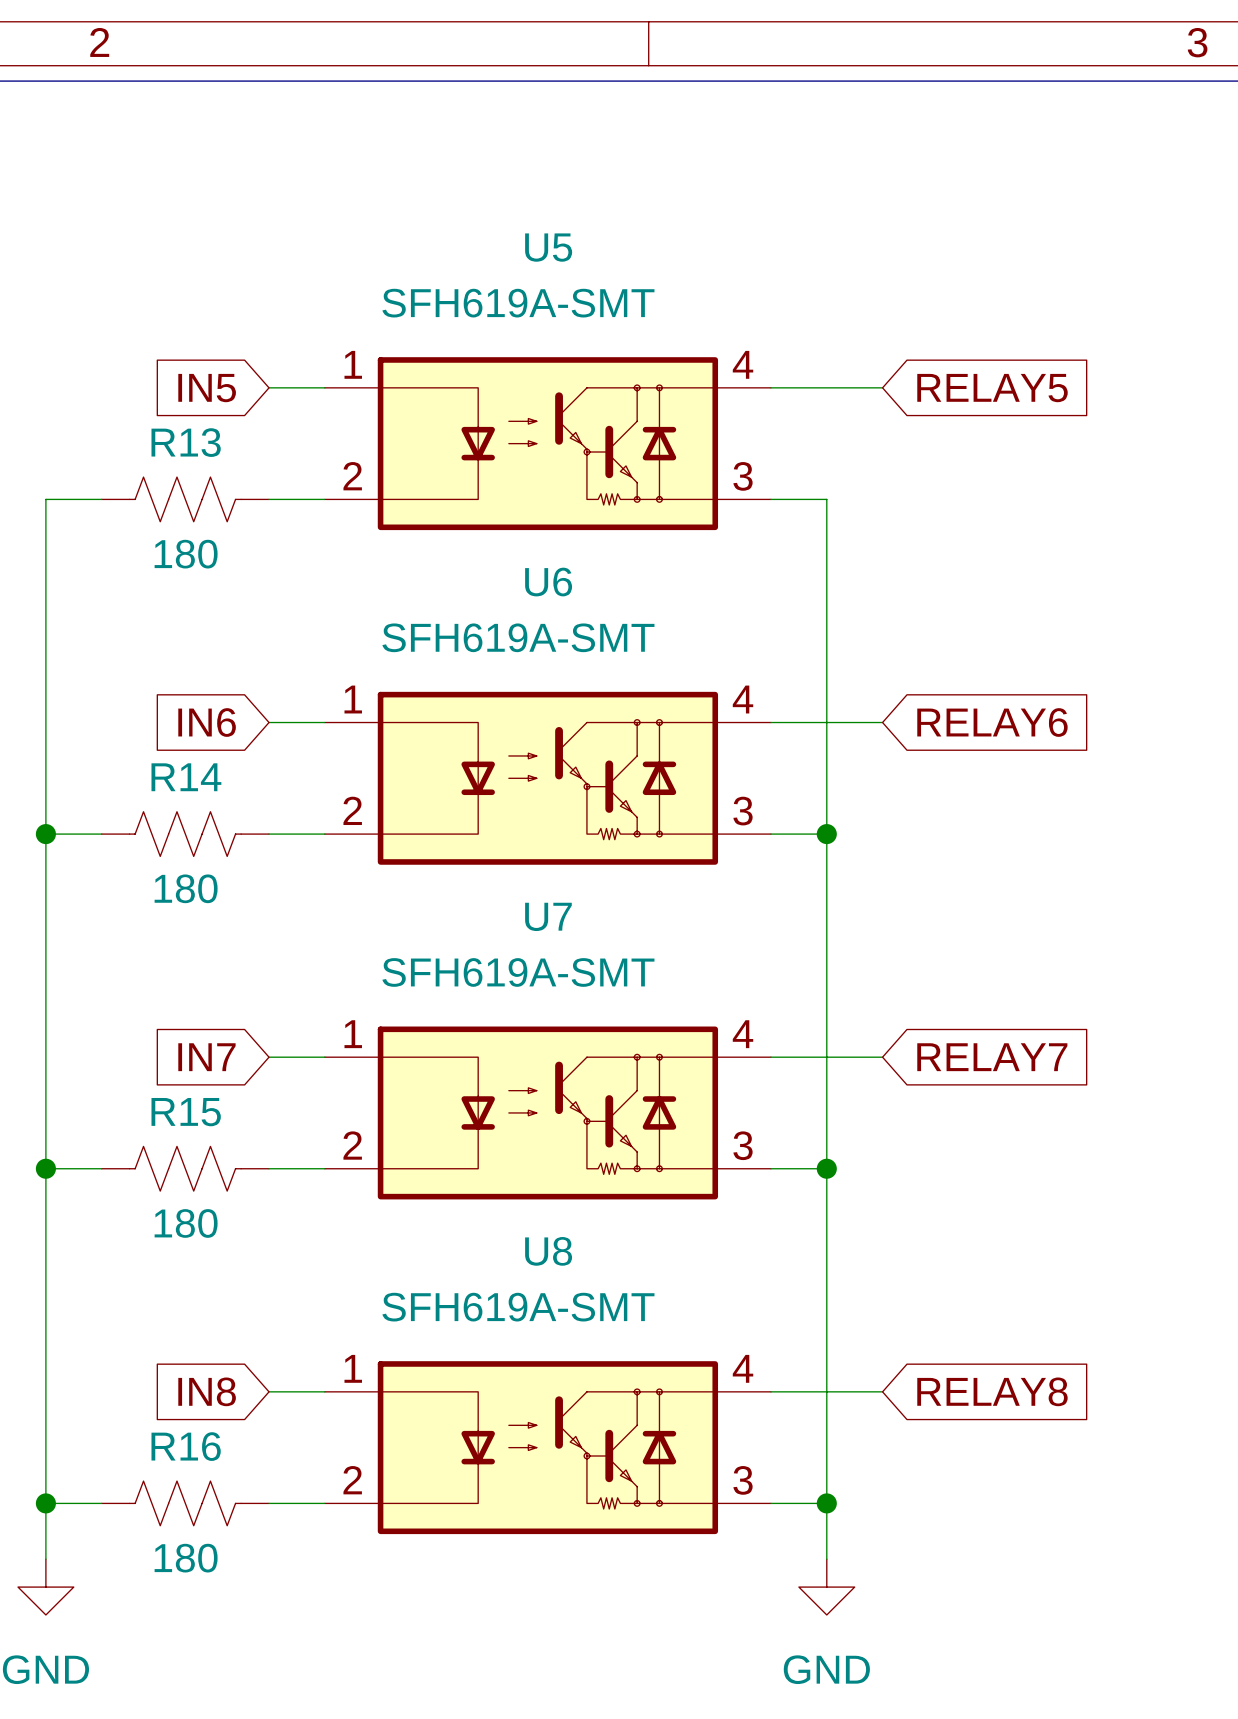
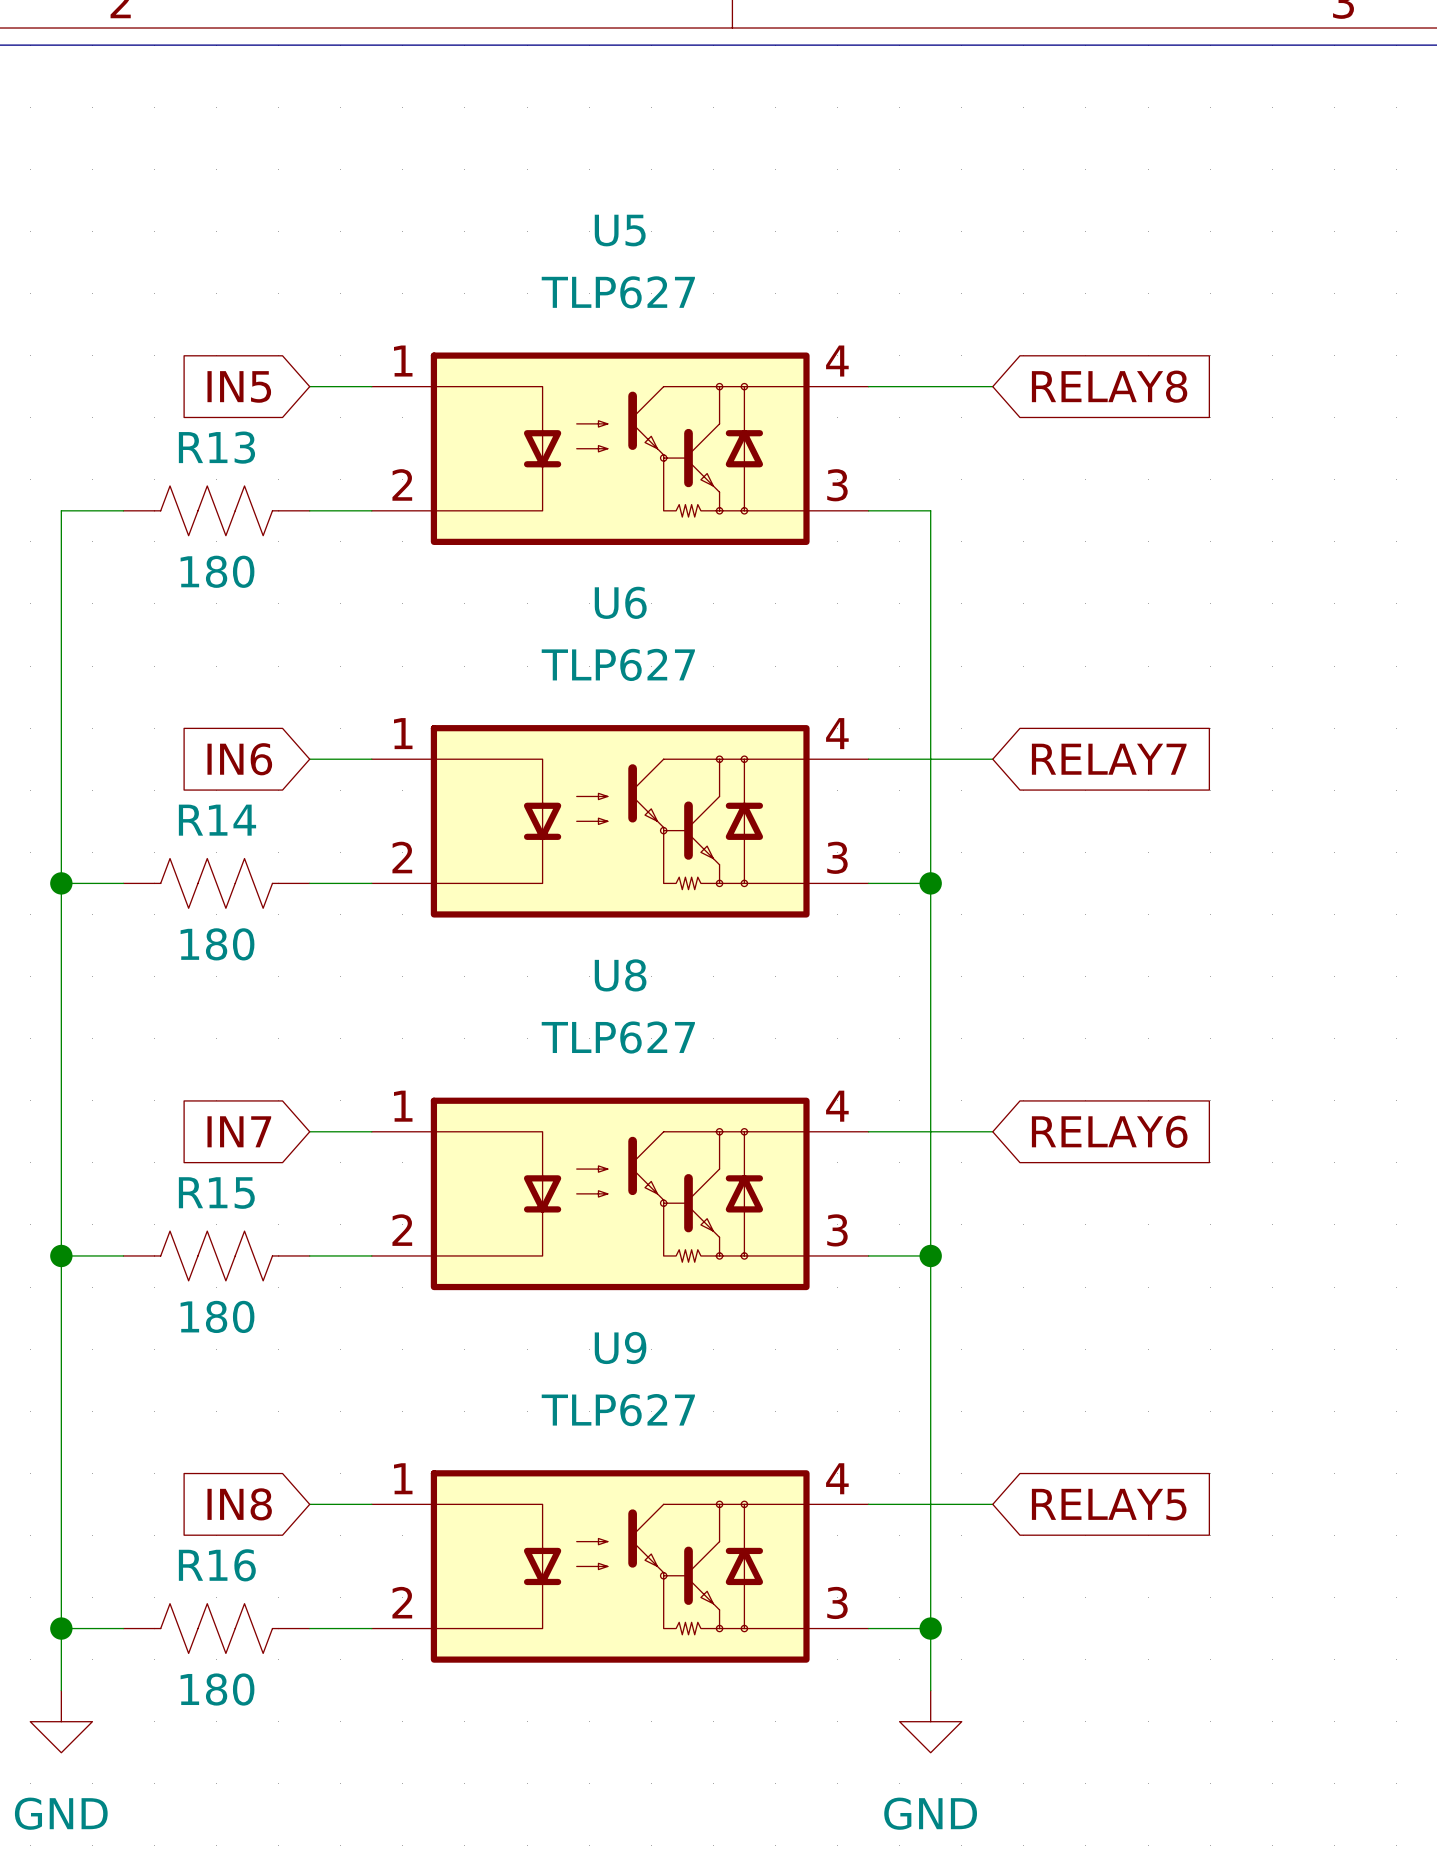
U5 value: SFH619A-SMT (518, 303) -> TLP627 (618, 292)
global label: RELAY5 (992, 388) -> RELAY8 (1109, 386)
U6 value: SFH619A-SMT (518, 637) -> TLP627 (618, 664)
global label: RELAY6 (992, 722) -> RELAY7 (1109, 759)
U7 name: U7 (548, 916) -> U8 (620, 975)
U7 value: SFH619A-SMT (518, 972) -> TLP627 (618, 1037)
global label: RELAY7 (992, 1057) -> RELAY6 (1109, 1131)
U8 name: U8 (548, 1251) -> U9 (620, 1347)
U8 value: SFH619A-SMT (518, 1307) -> TLP627 (618, 1410)
global label: RELAY8 (992, 1391) -> RELAY5 (1109, 1504)

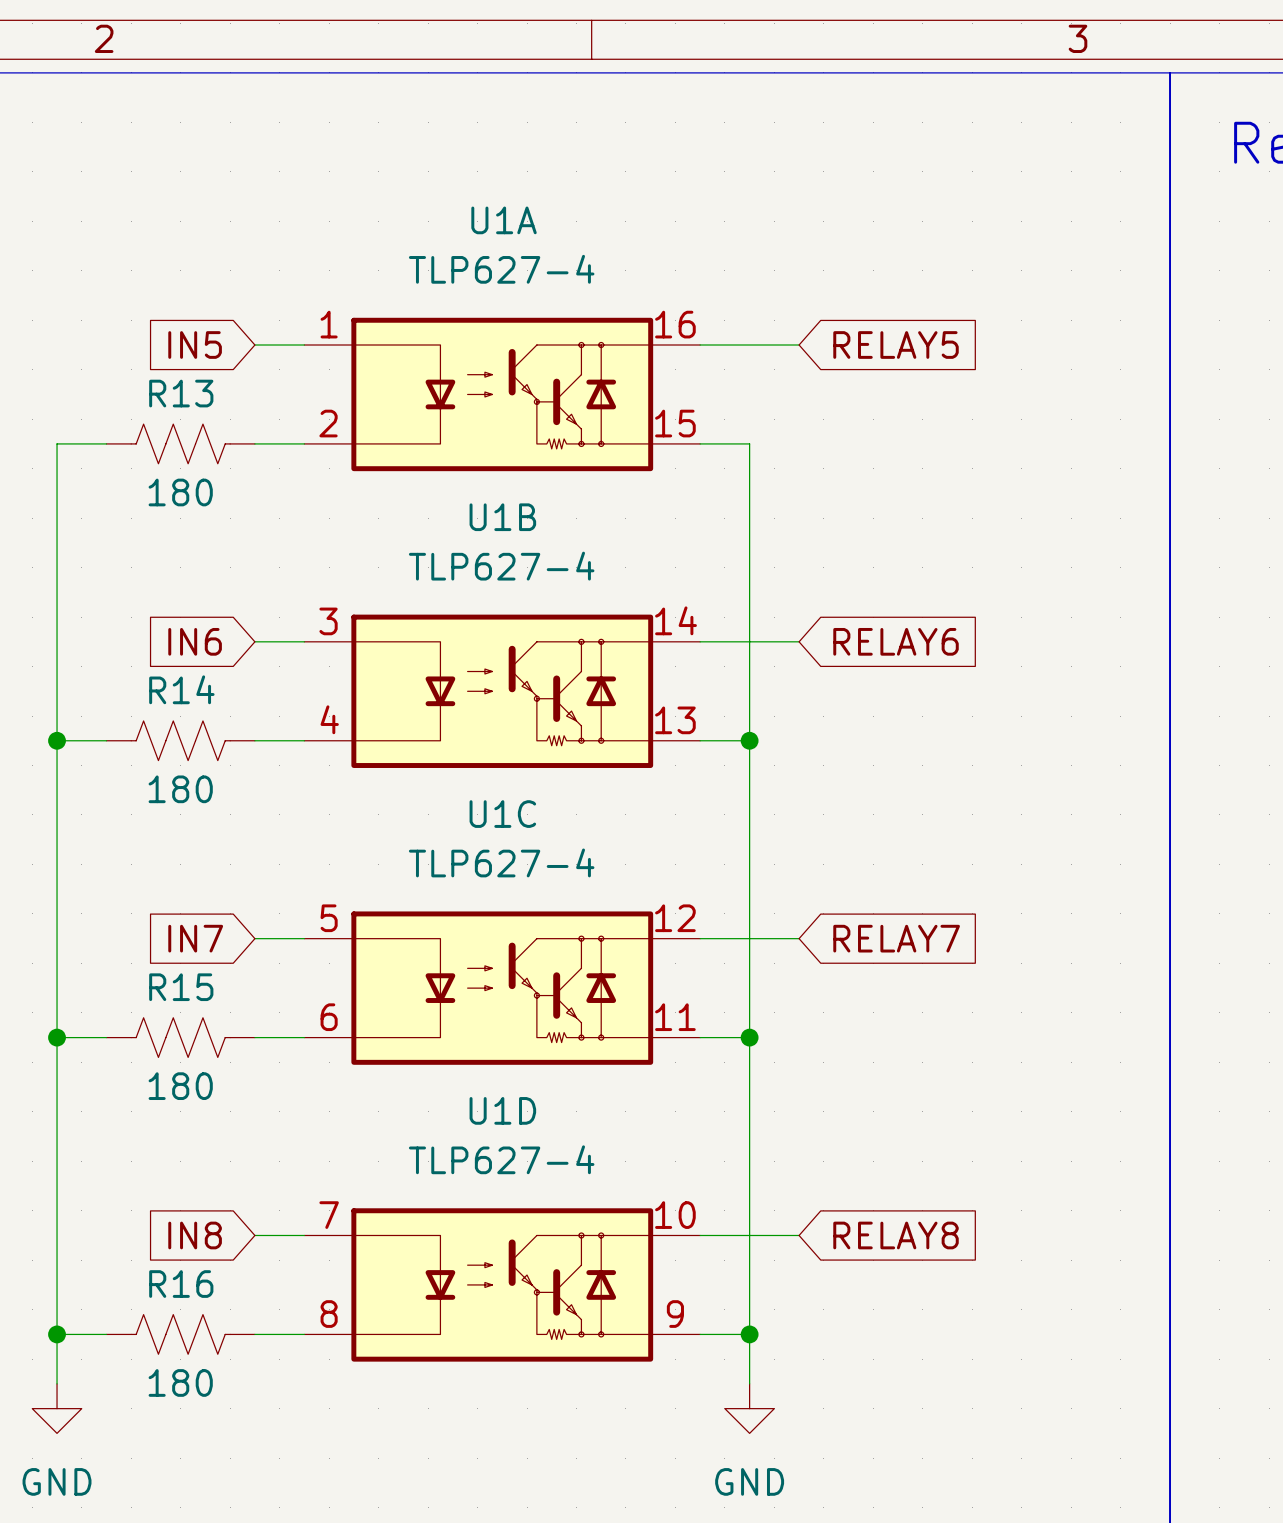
global label: RELAY8 (1109, 386) -> RELAY5 (896, 345)
U5: TLP627 (620, 448) -> none
U1A: none -> TLP627-4 (502, 394)
global label: RELAY7 (1109, 759) -> RELAY6 (896, 641)
U6: TLP627 (620, 821) -> none
U1B: none -> TLP627-4 (502, 691)
global label: RELAY6 (1109, 1131) -> RELAY7 (896, 938)
U8: TLP627 (620, 1193) -> none
U1C: none -> TLP627-4 (502, 988)
global label: RELAY5 (1109, 1504) -> RELAY8 (896, 1235)
U9: TLP627 (620, 1566) -> none
U1D: none -> TLP627-4 (502, 1284)

